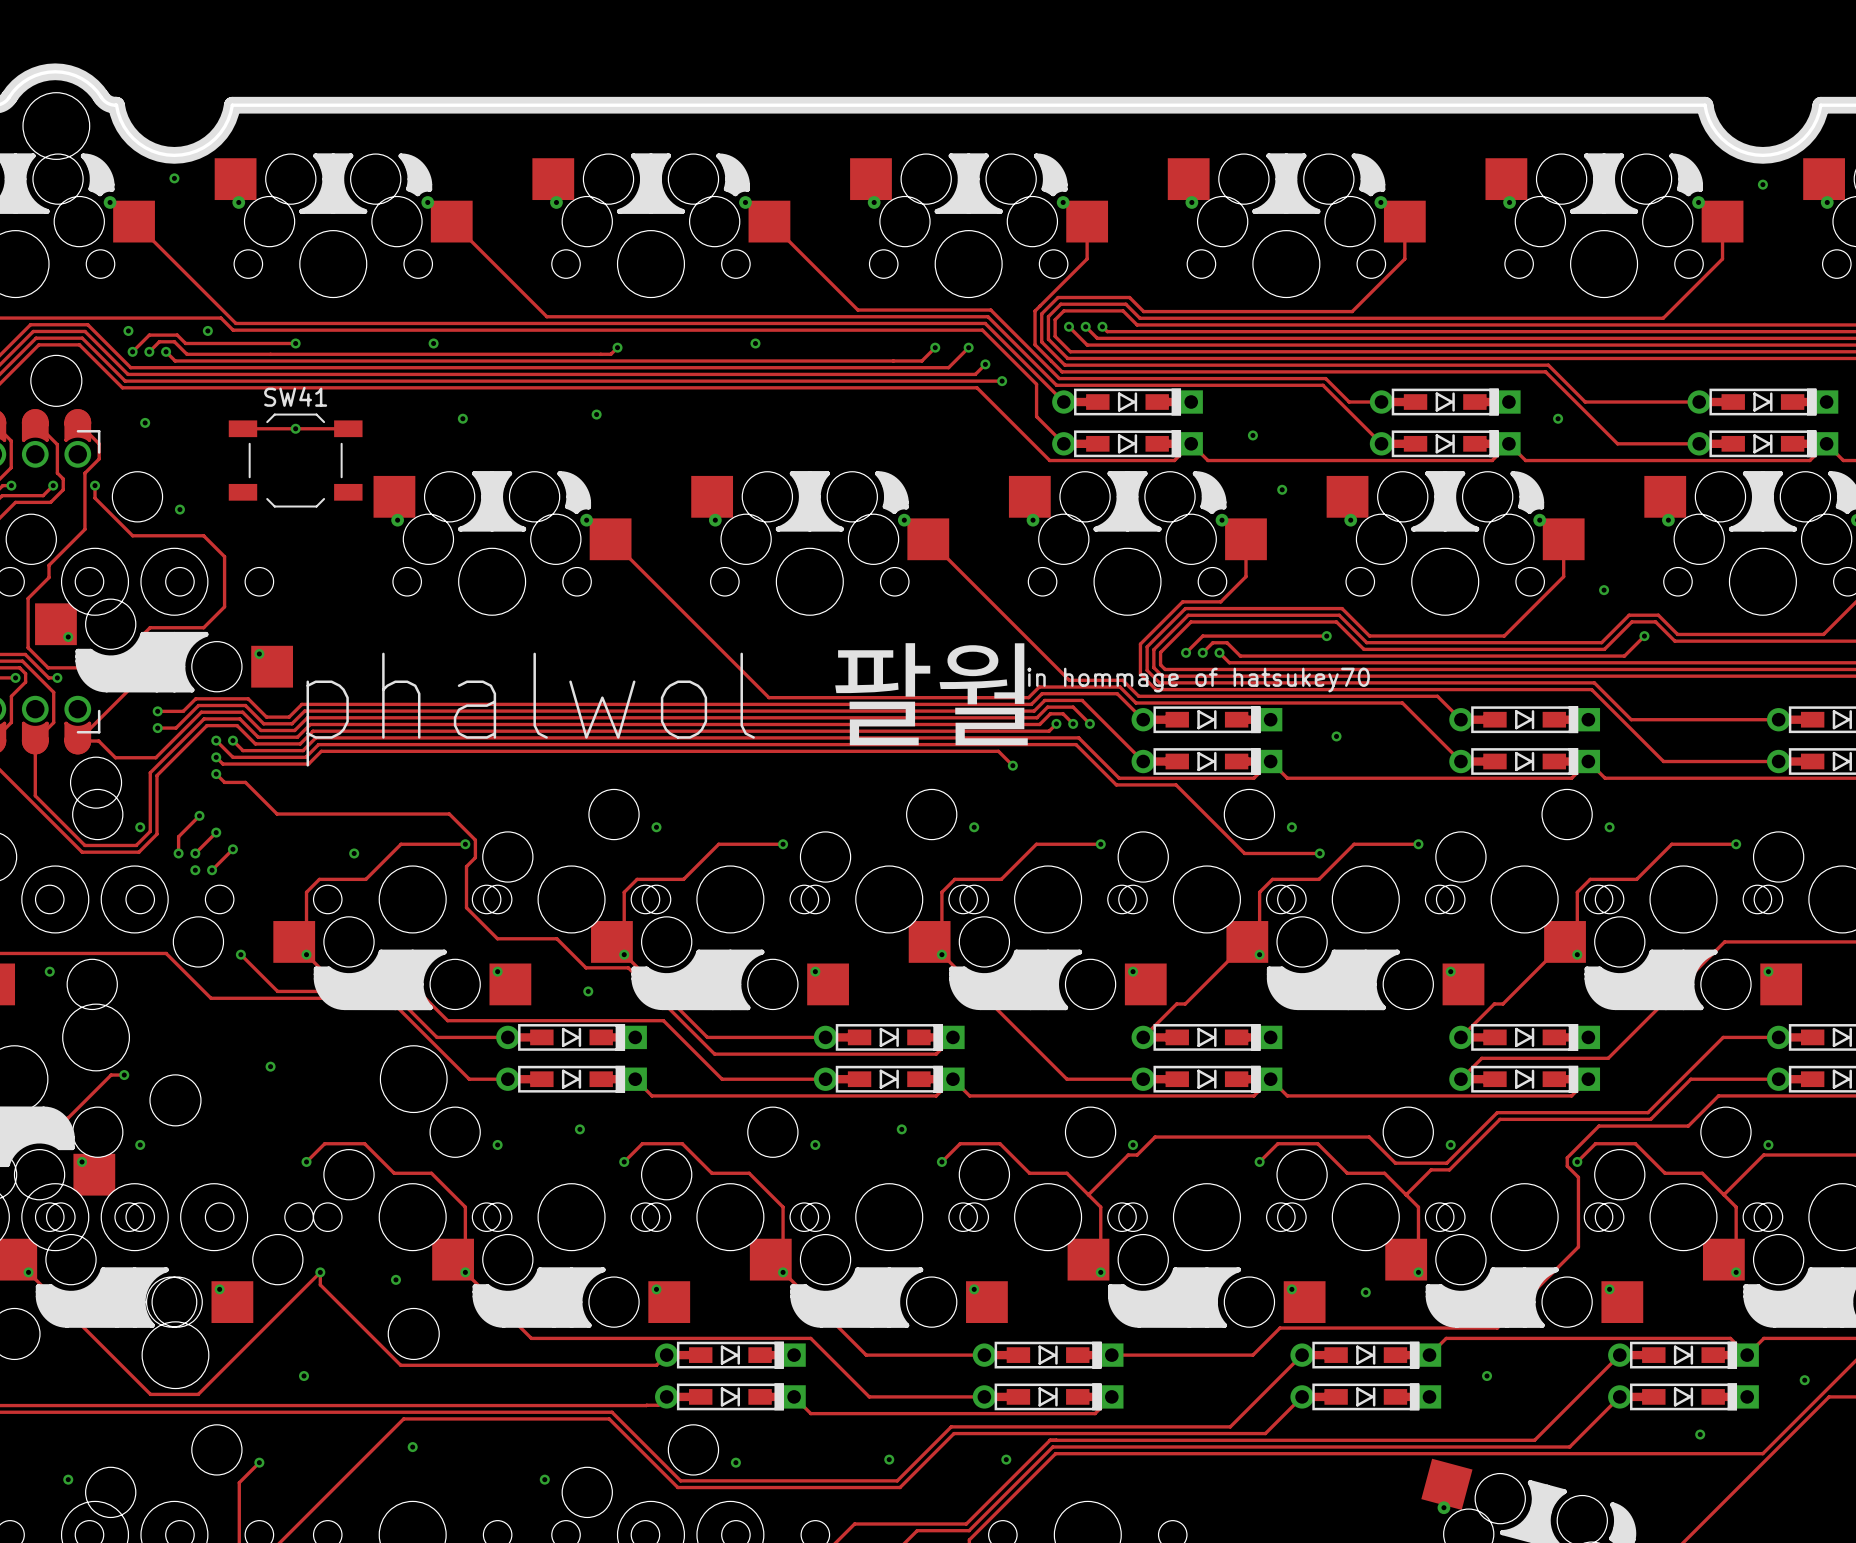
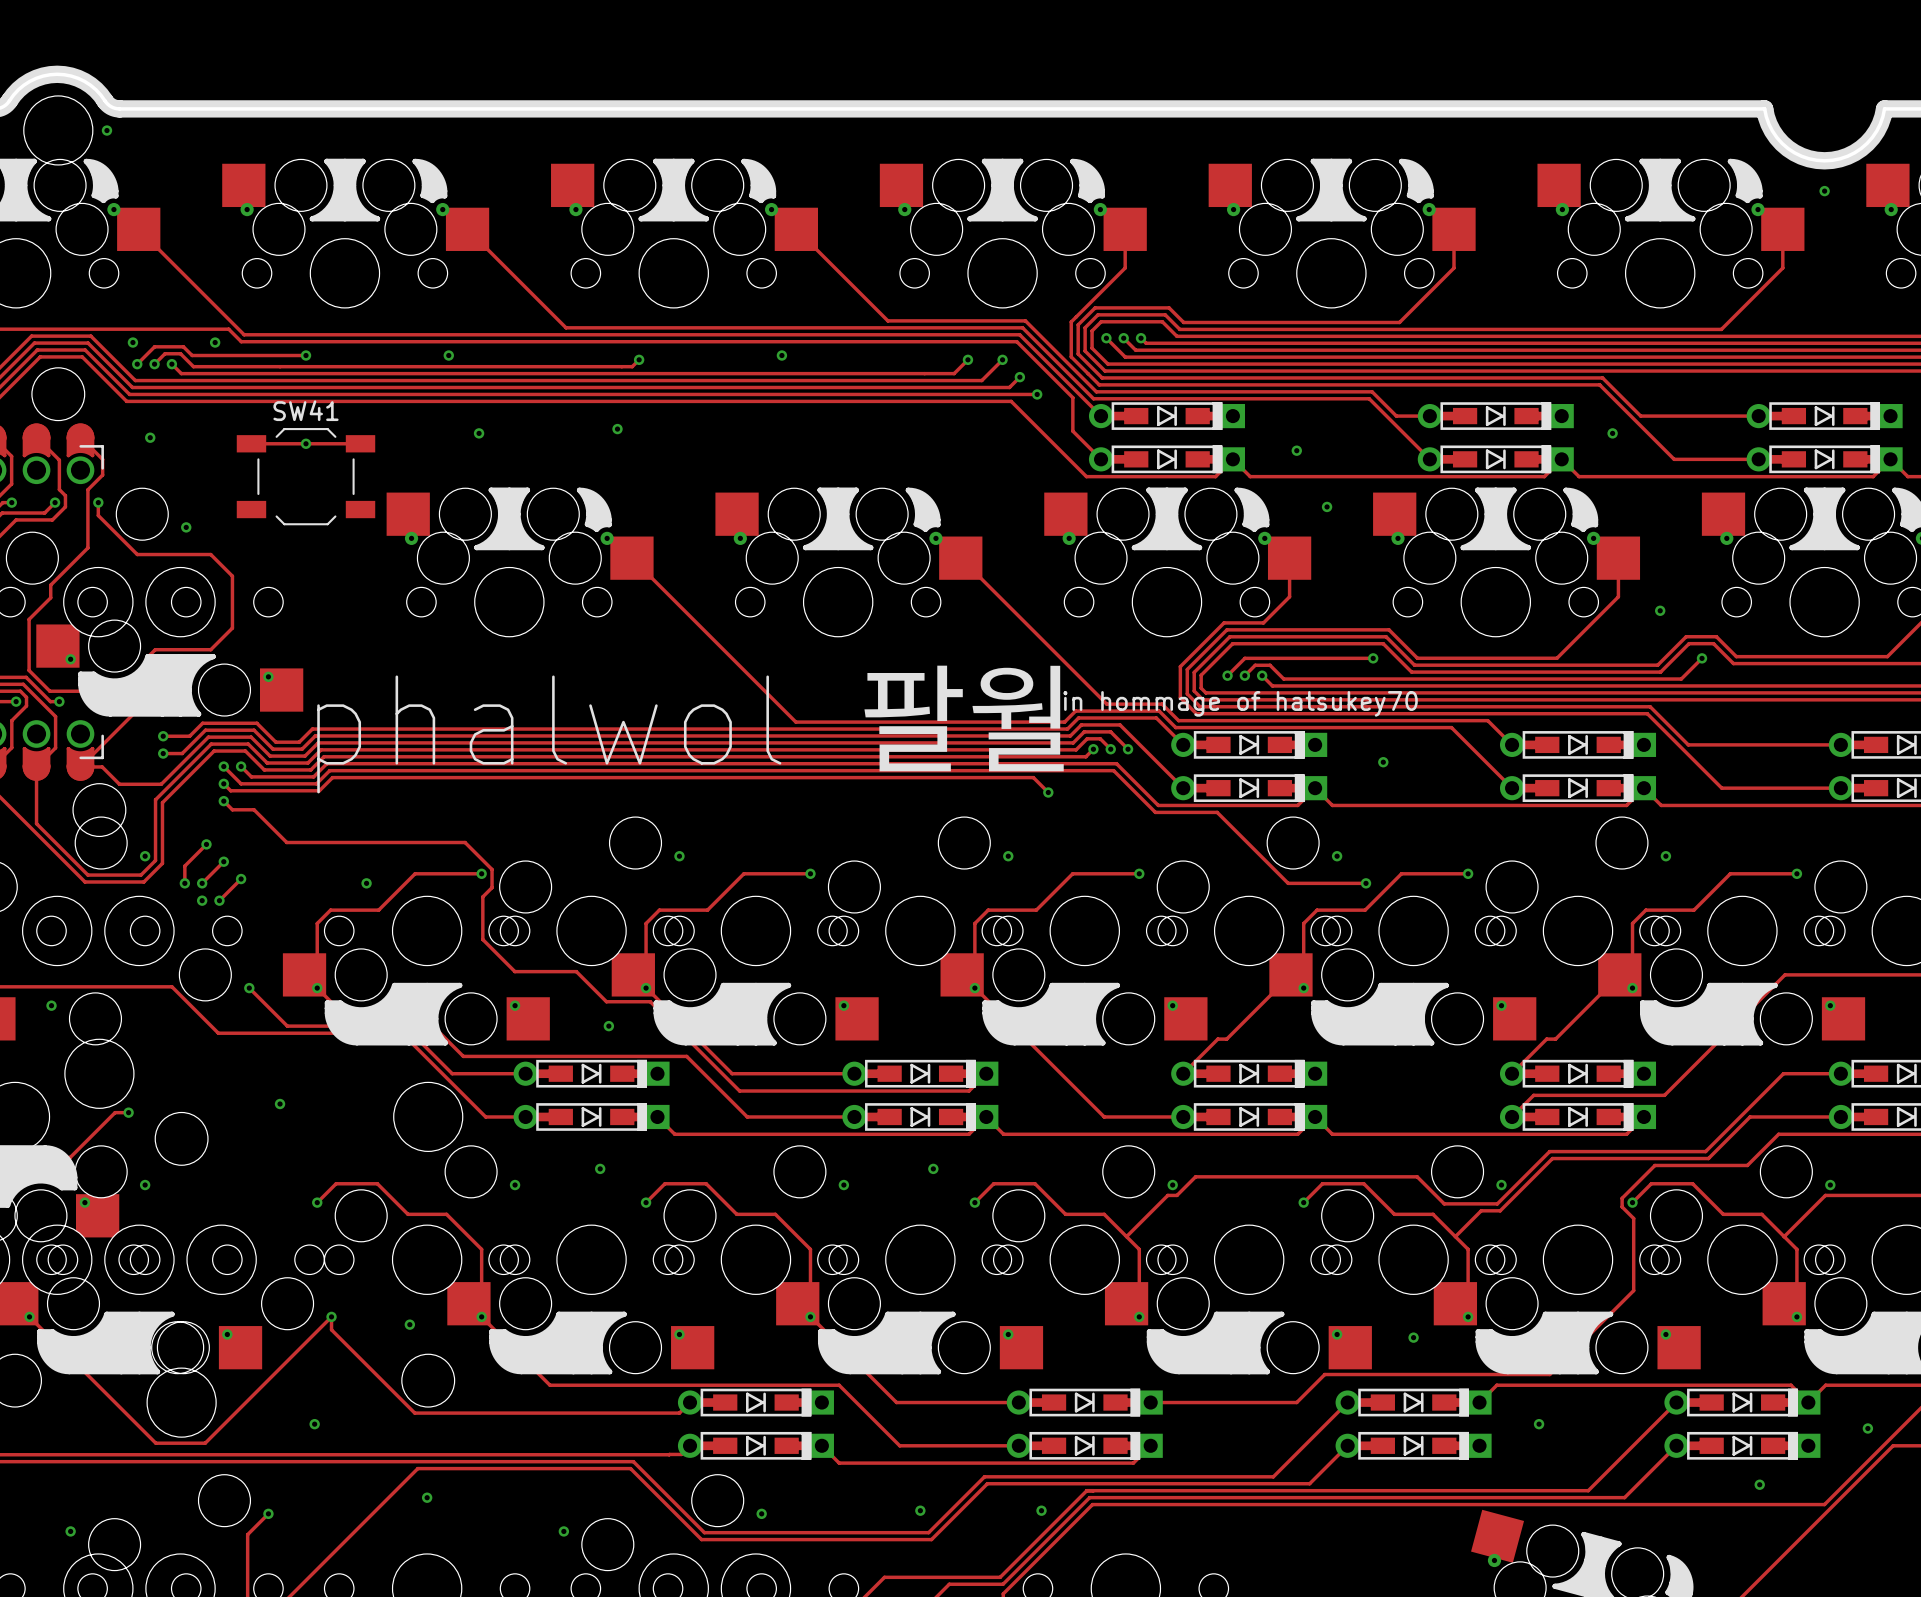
line: (116, 105) (124, 126) (139, 143) (152, 151) (174, 155) (196, 151) (215, 138) (224, 126) (232, 105) -> (120, 108) (240, 108)
via position: (174, 178) -> (106, 130)

